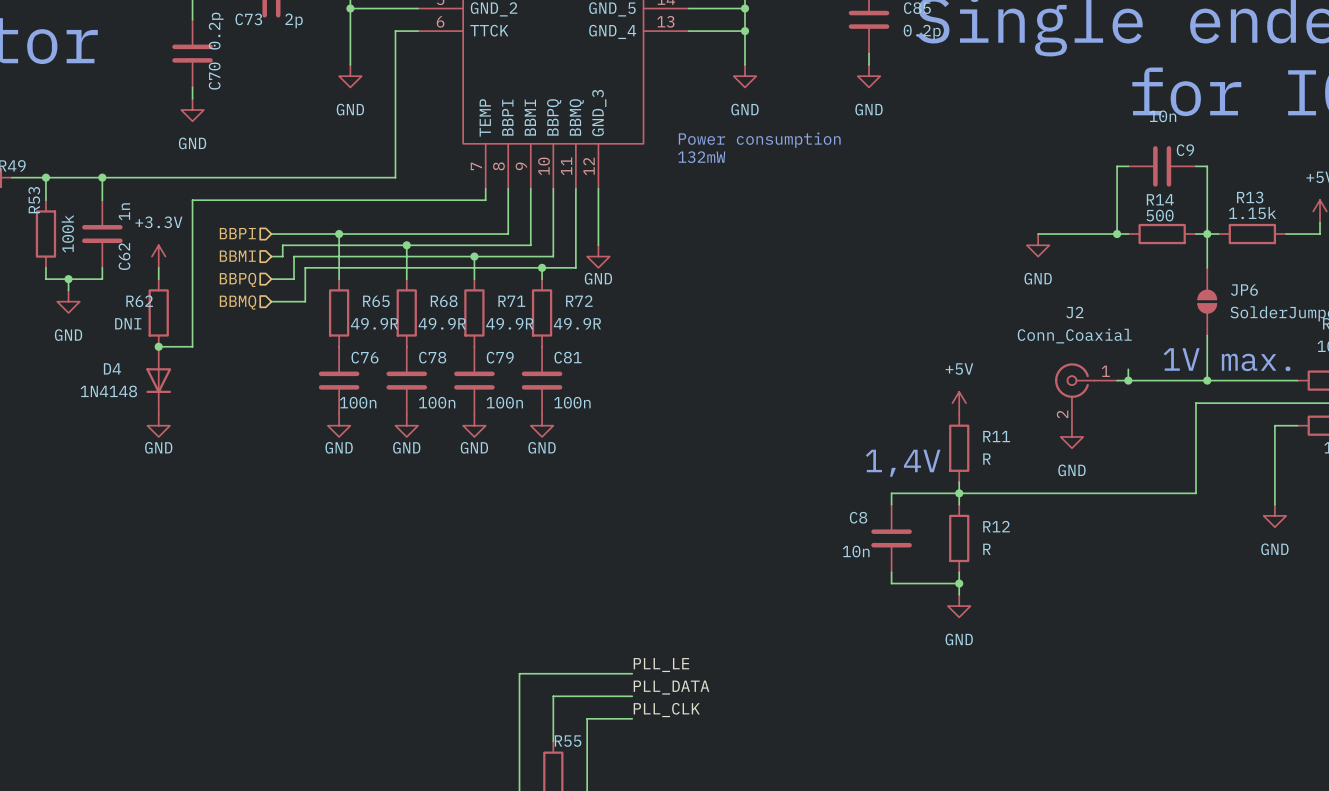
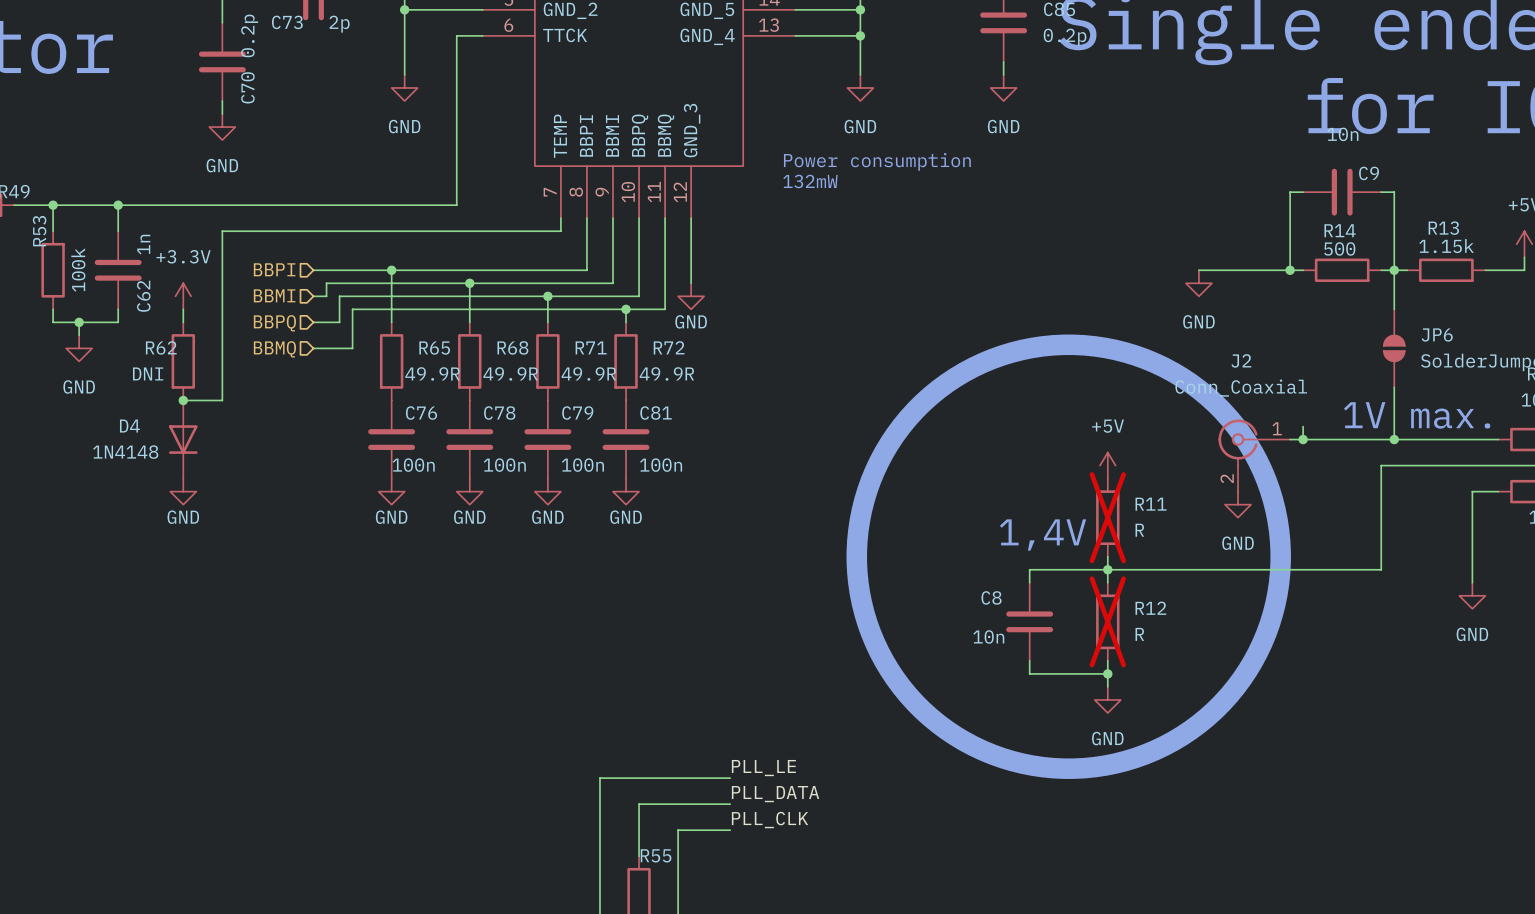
drawing: none -> [846, 334, 1291, 779]
R11 do-not-place cross: none -> (1107, 517)
R12 do-not-place cross: none -> (1107, 621)

